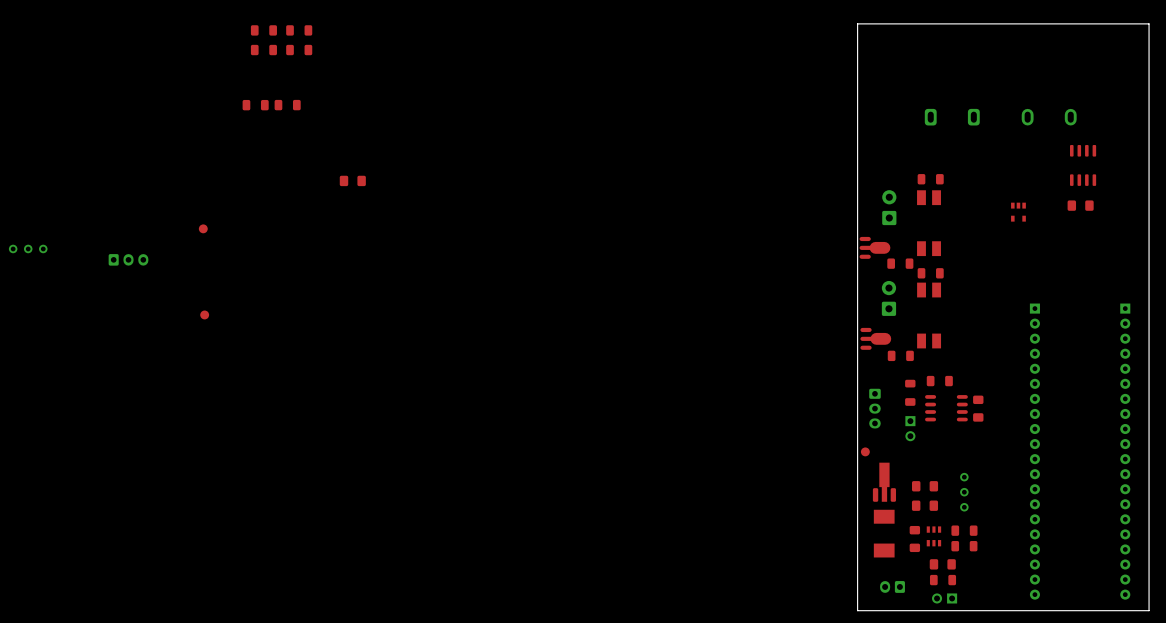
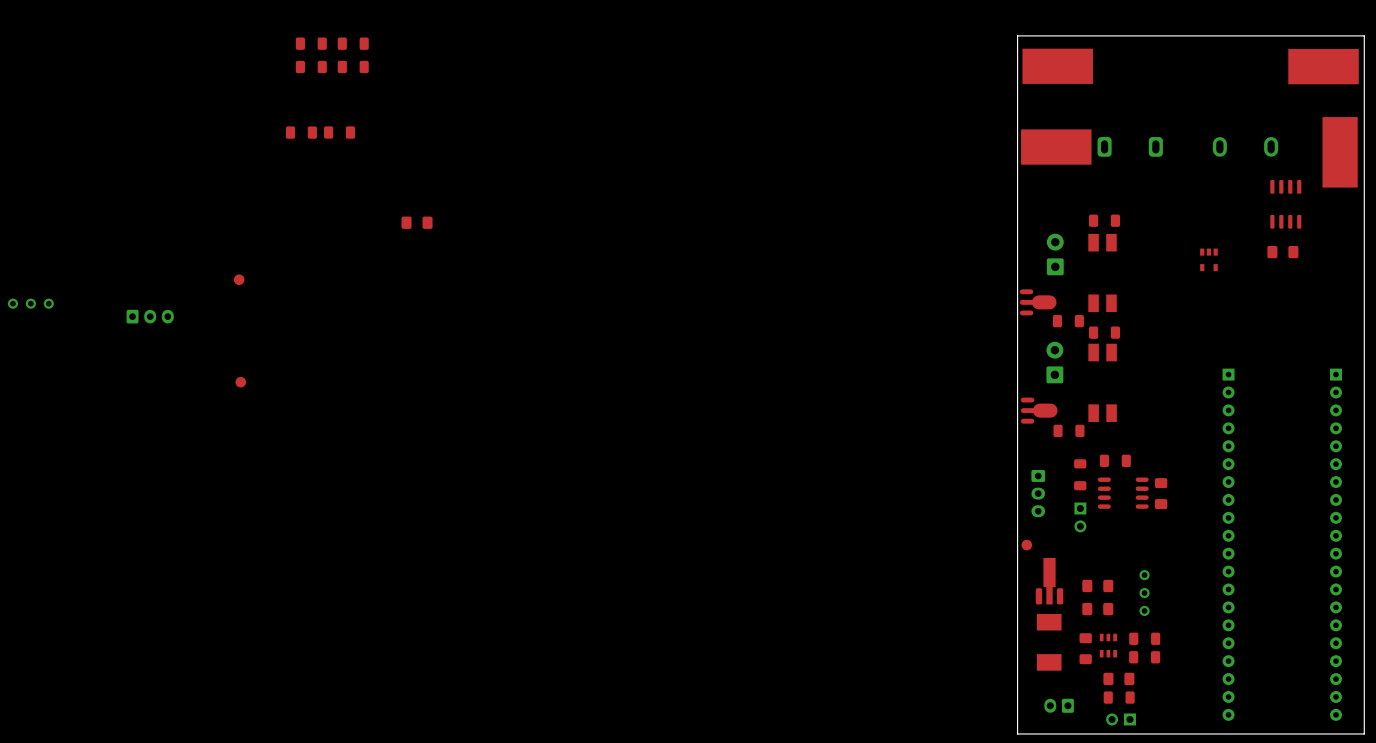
part: none -> (1057, 66)
part: none -> (1323, 66)
part: none -> (1056, 147)
part: none -> (1340, 152)

